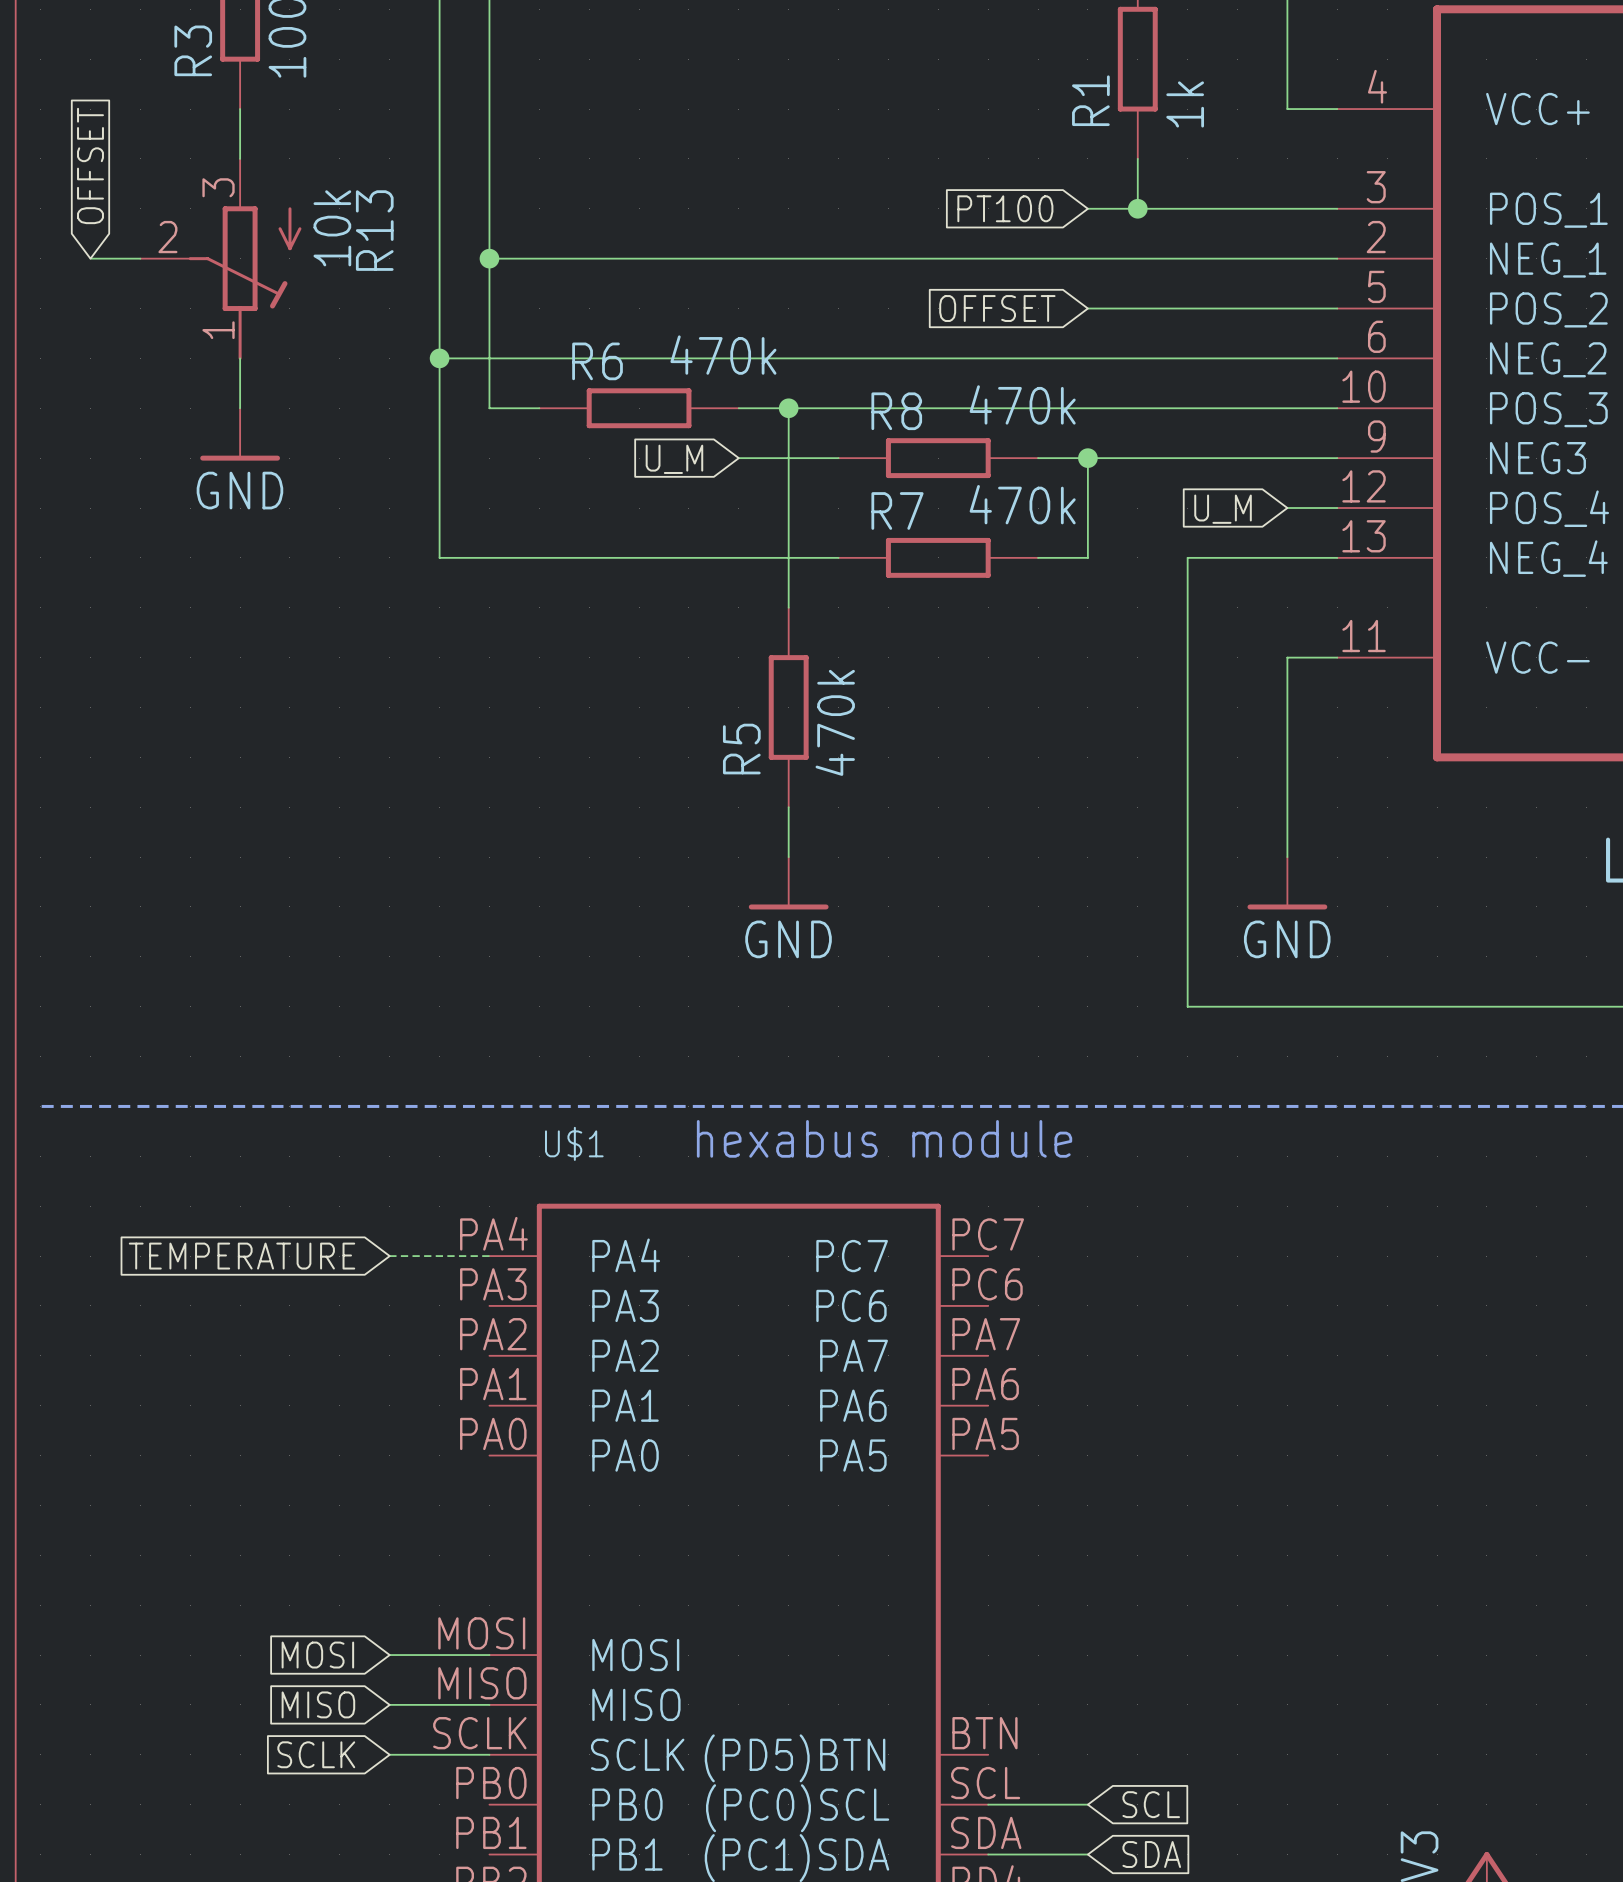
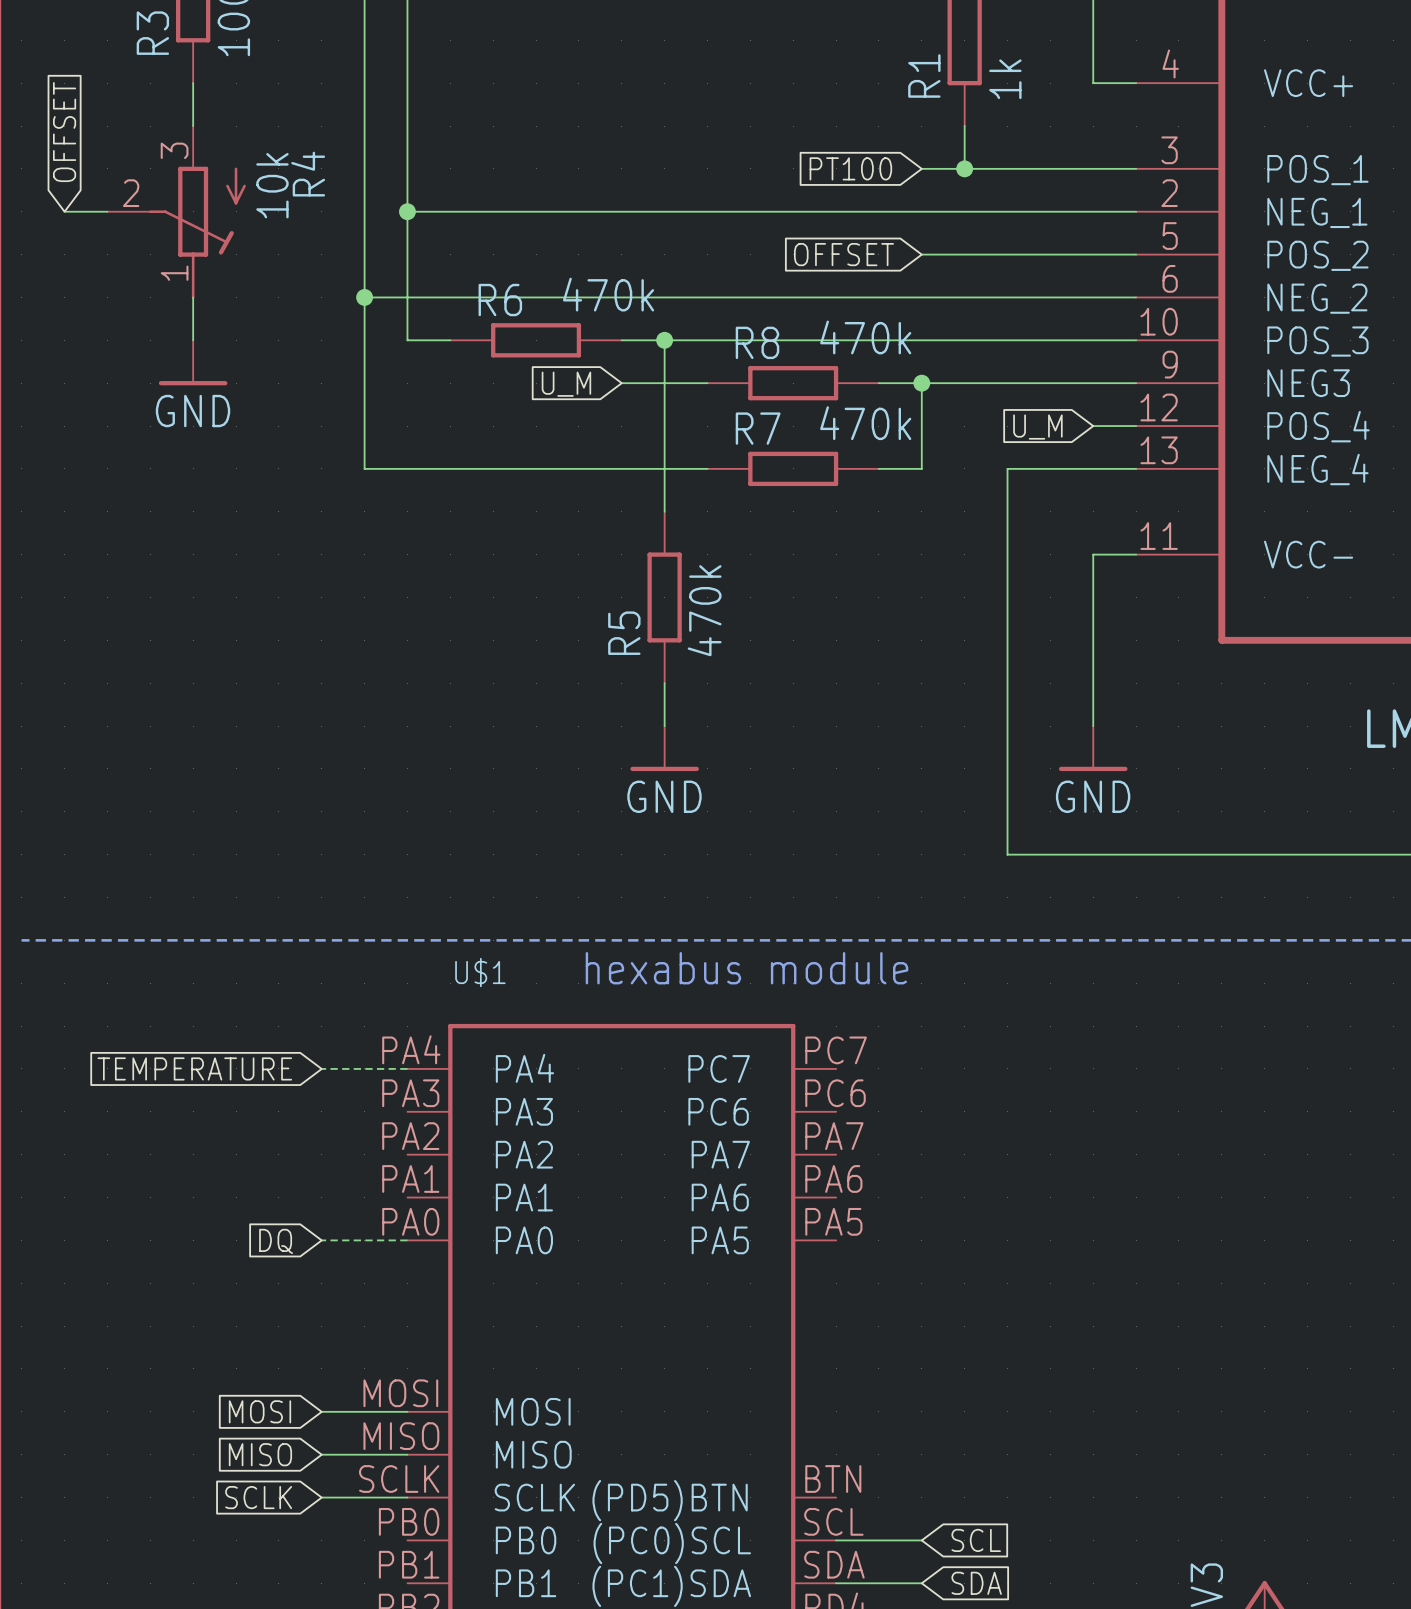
R13 name: R13 (374, 230) -> R4 (308, 174)
wire: none -> (321, 1240) (407, 1240)
global label: none -> DQ (276, 1241)

